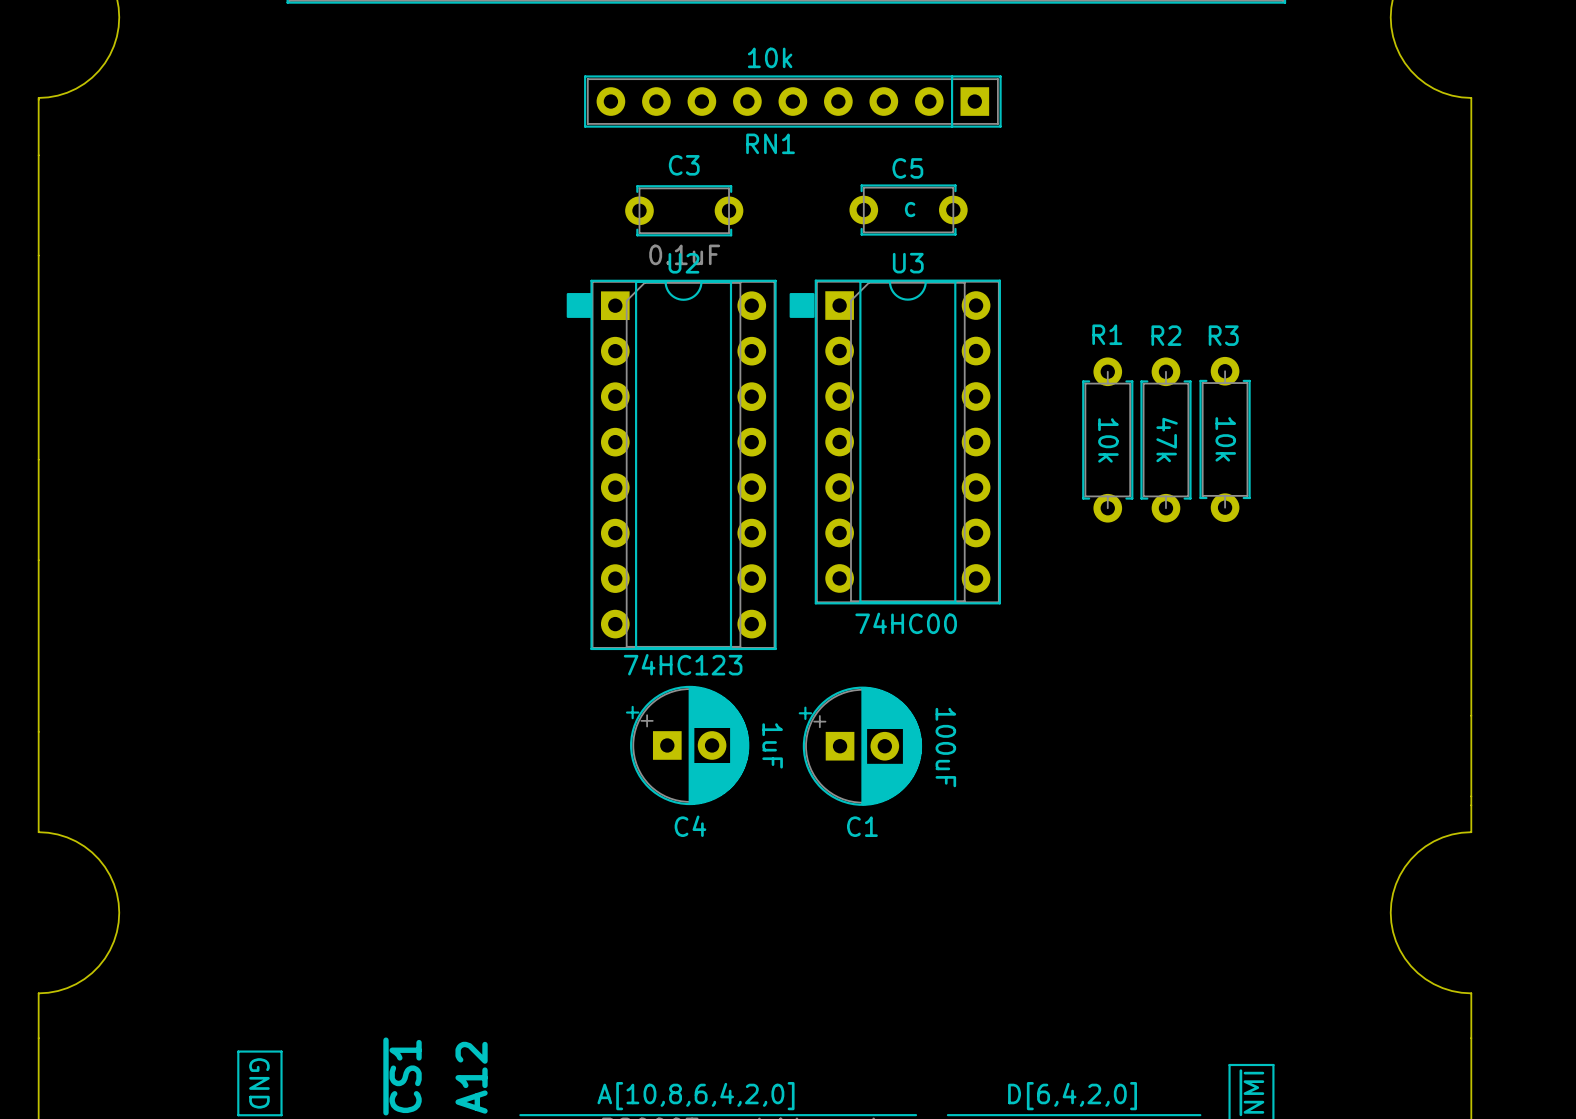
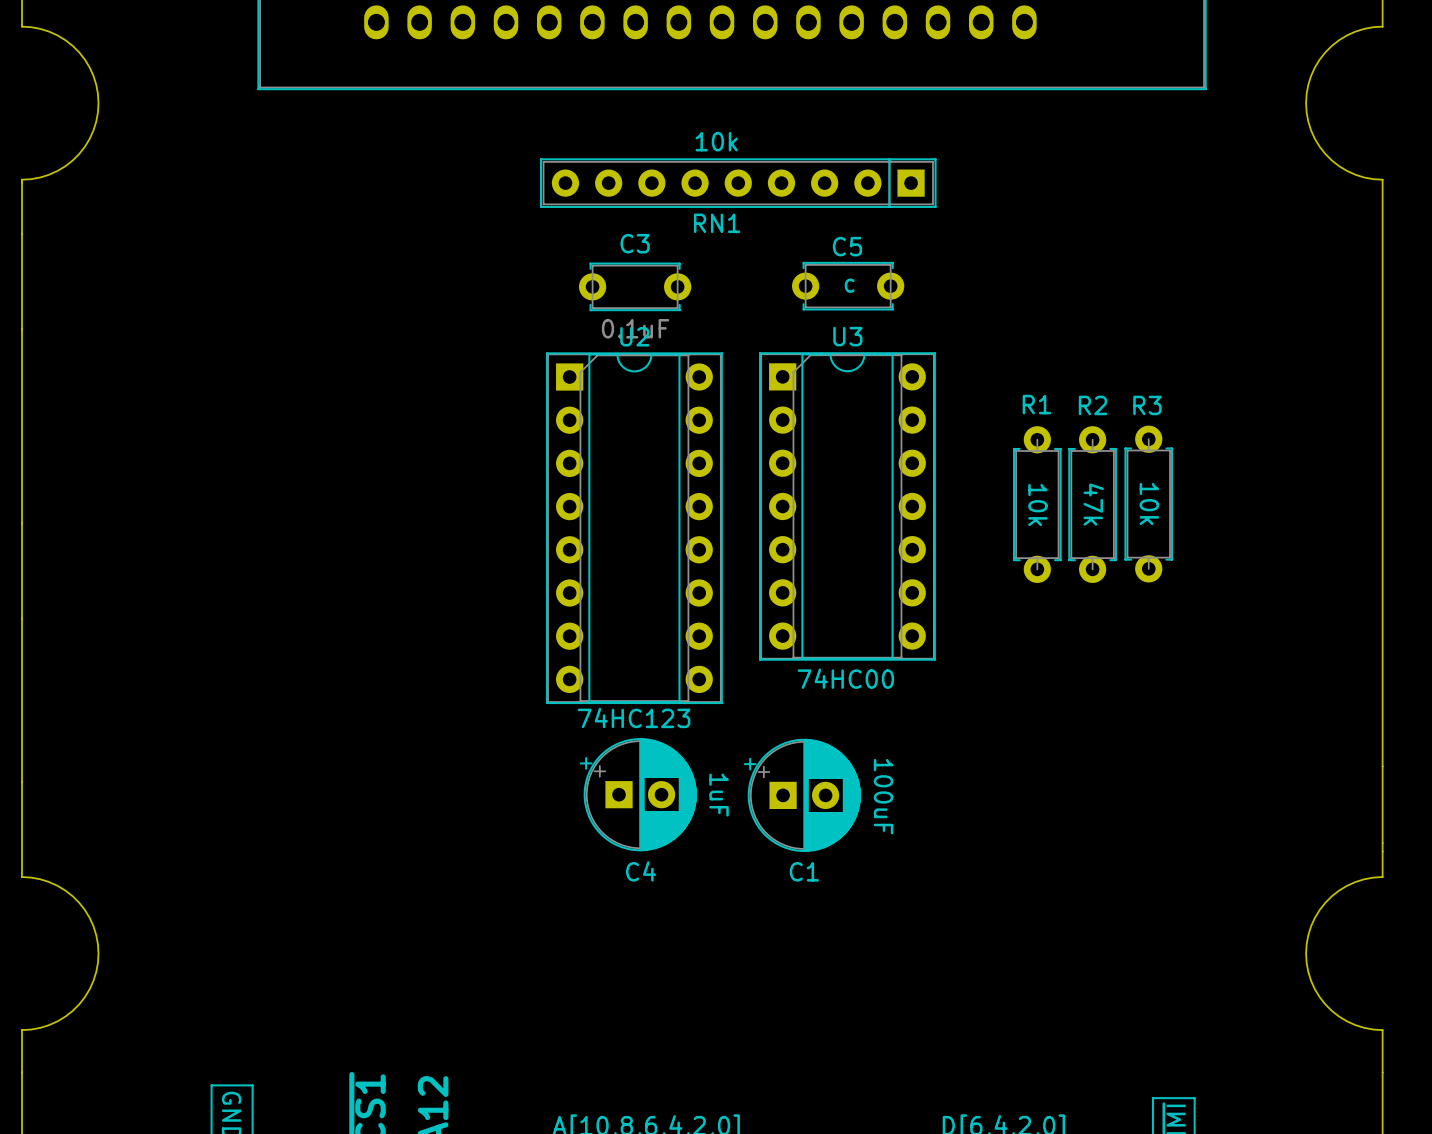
drawing: [566, 293, 592, 318] -> none
drawing: [789, 293, 815, 318] -> none

